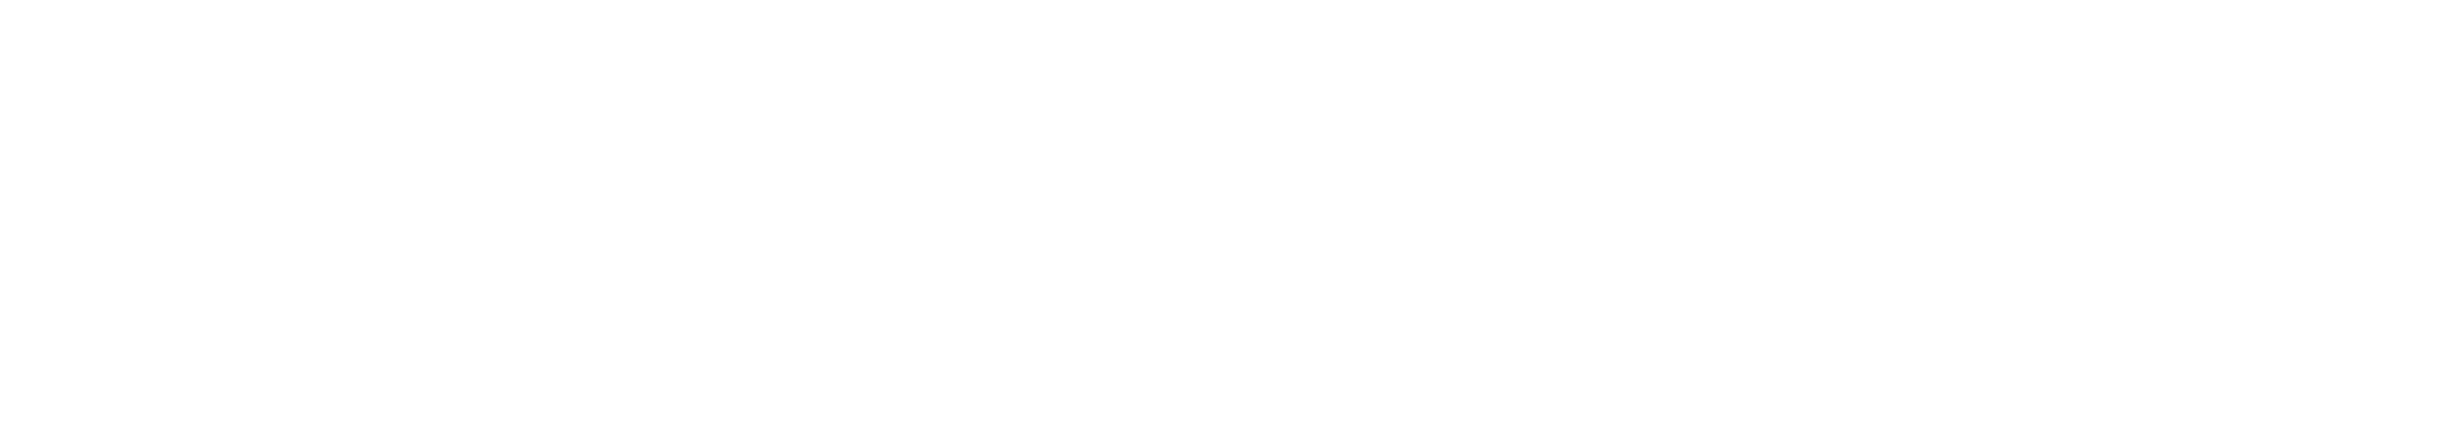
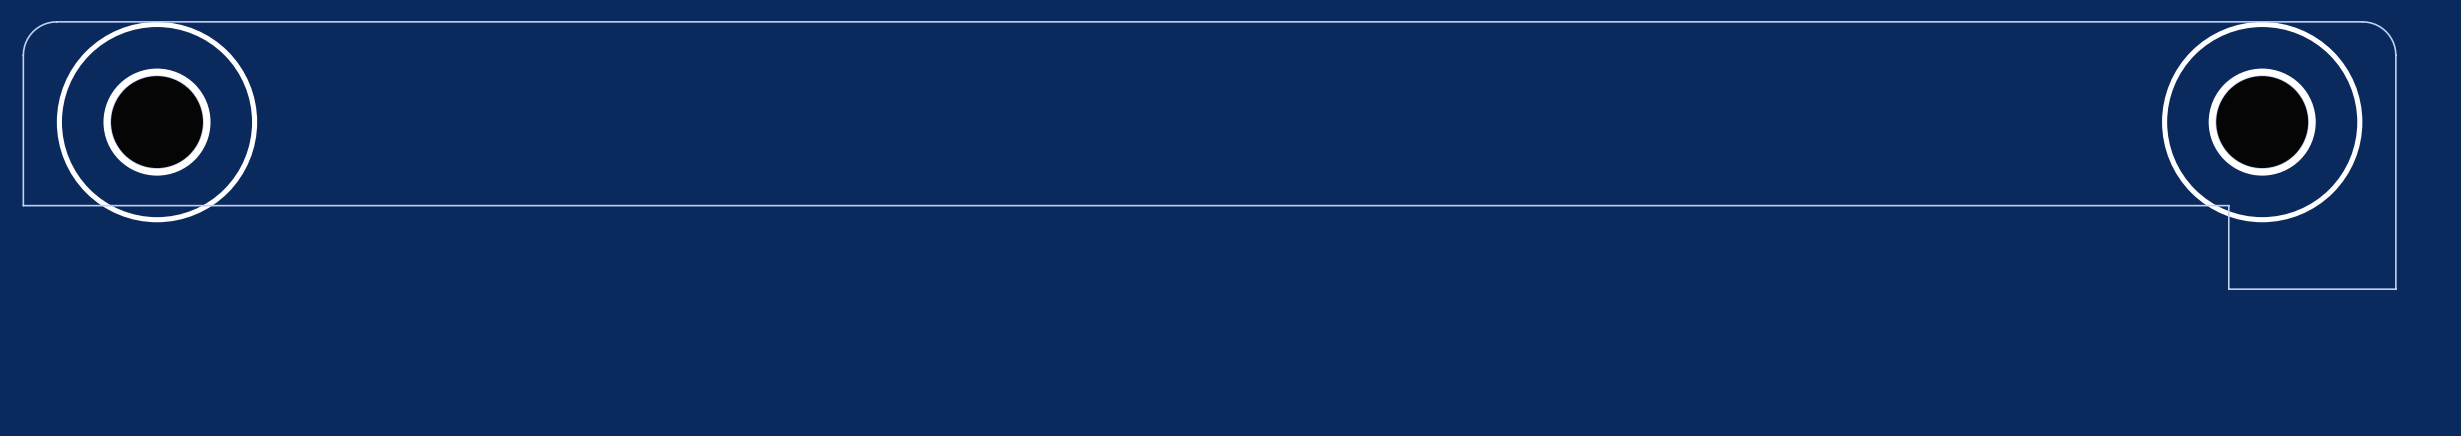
board edge: none -> (56, 21) (2366, 22) (2375, 24) (2386, 31) (2393, 42) (2395, 50) (2395, 289) (2228, 289) (2228, 205) (23, 205) (23, 50) (27, 38) (36, 28) (43, 24) (56, 21)
part: none -> (157, 122)
part: none -> (2262, 122)

